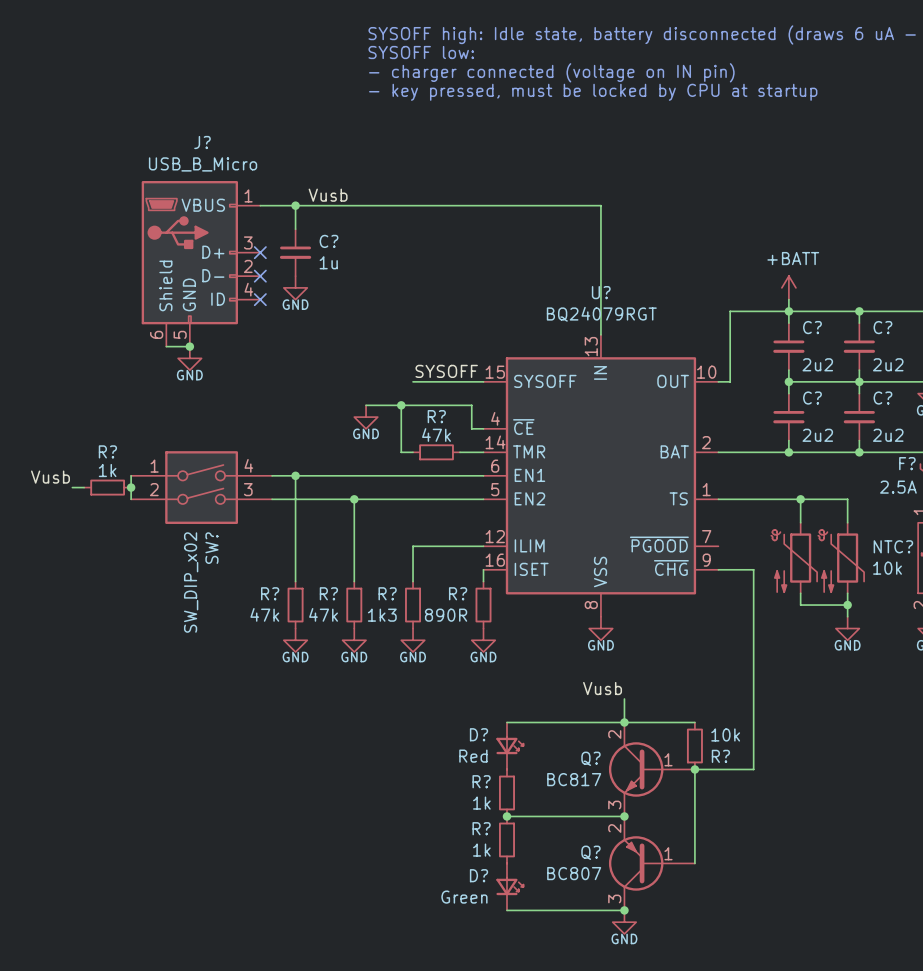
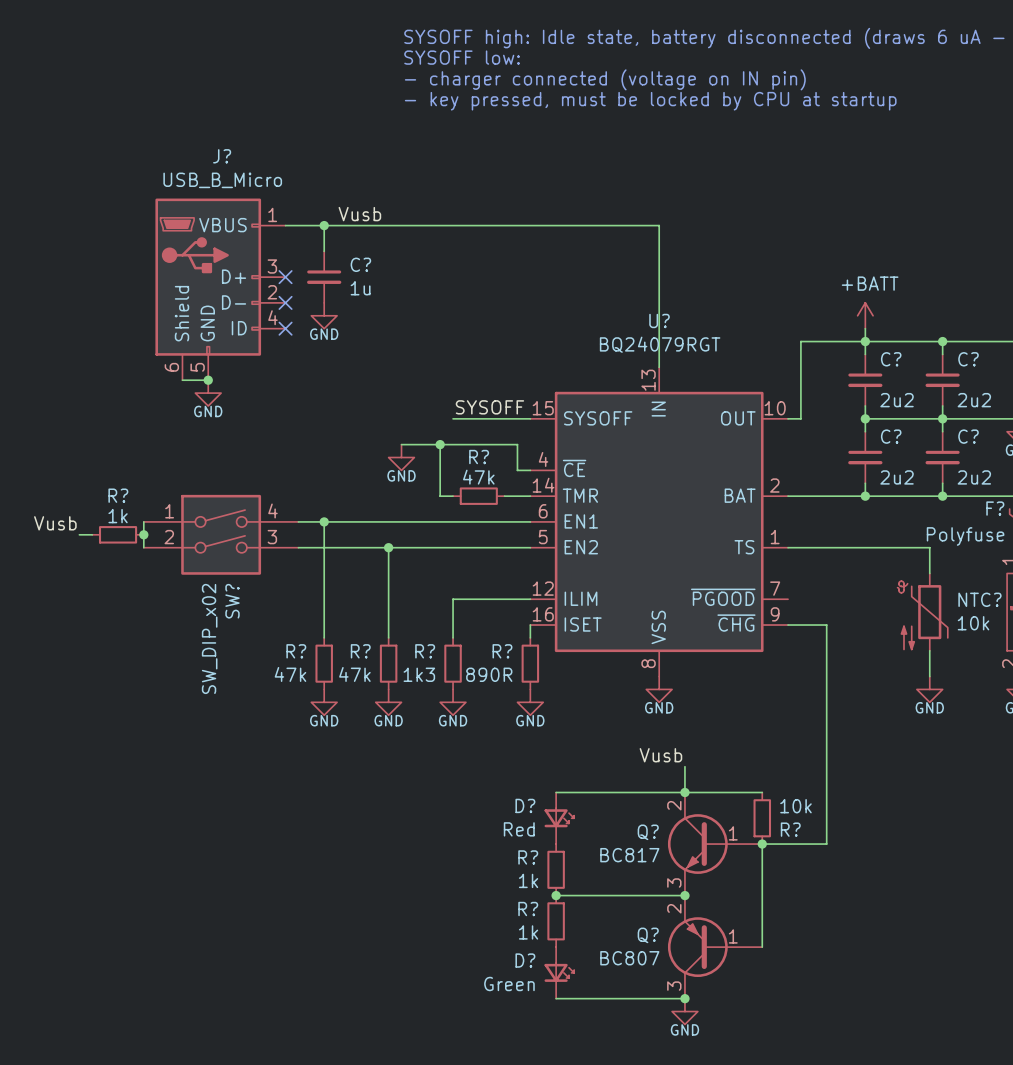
F? value: 2.5A (898, 487) -> Polyfuse (965, 536)
wire: (800, 499) (800, 522) -> none
junction: (800, 499) -> none
part: (794, 558) -> none
wire: (800, 593) (800, 605) (847, 605) -> none
junction: (847, 605) -> none

